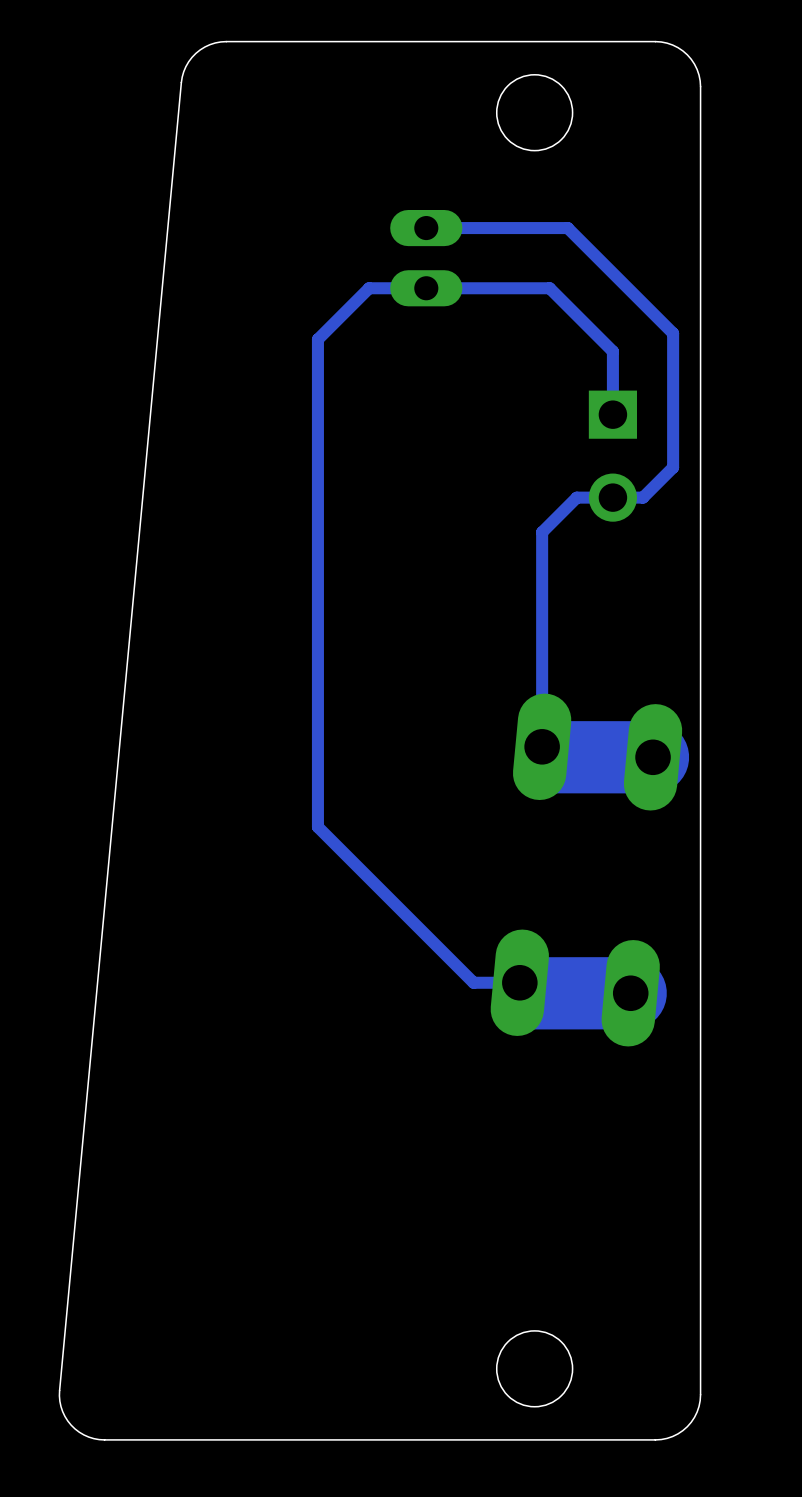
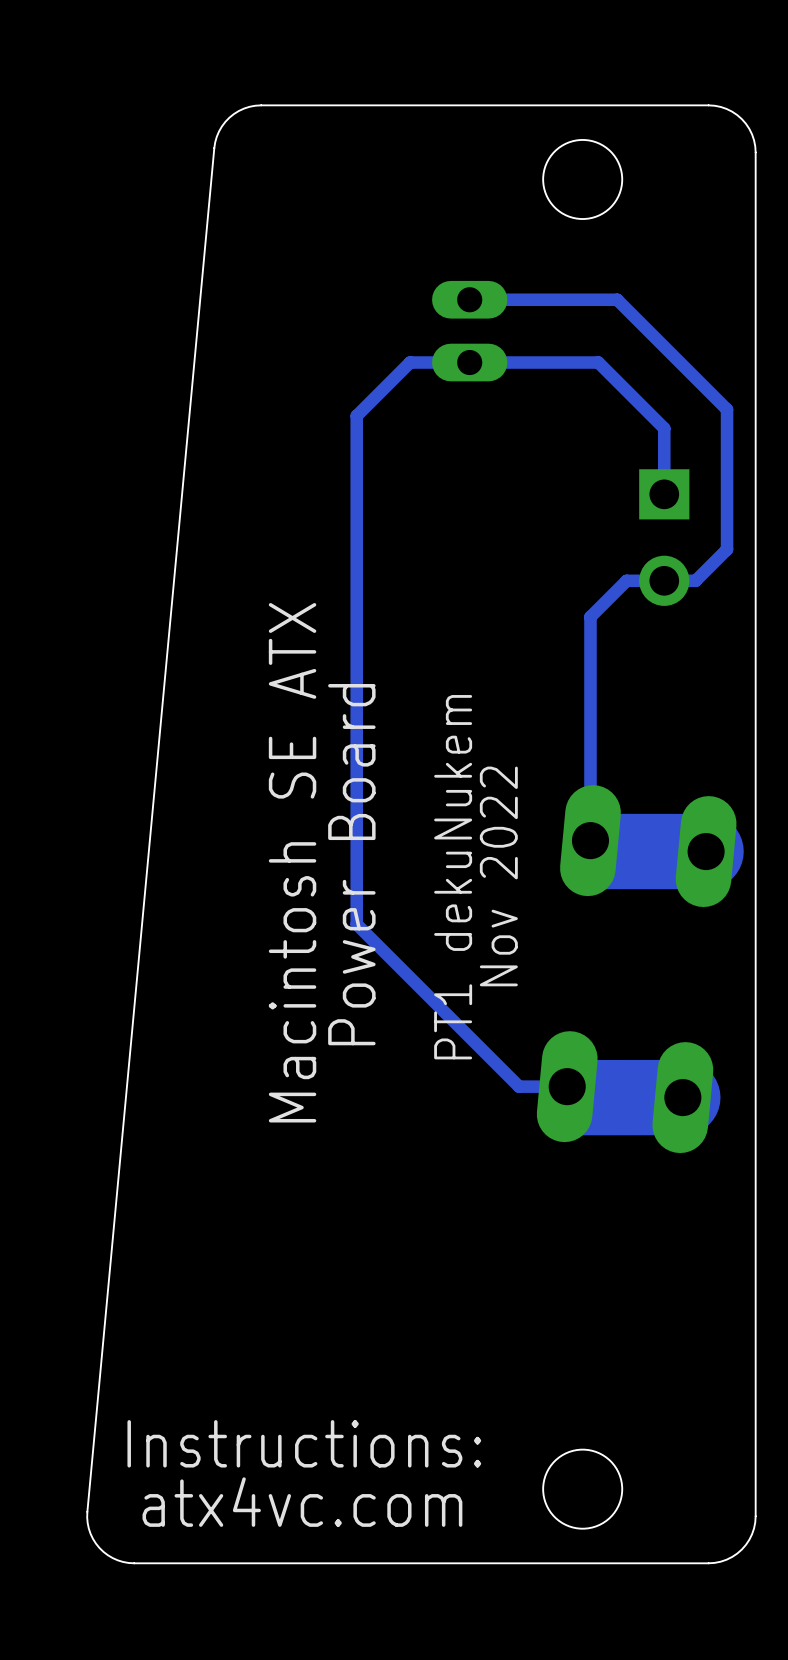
text: none -> Macintosh SE ATX (292, 862)
text: none -> Power Board (351, 864)
text: none -> PT1 dekuNukem (453, 877)
text: none -> Nov 2022 (498, 876)
text: none -> Instructions: (304, 1443)
text: none -> atx4vc.com (302, 1502)

